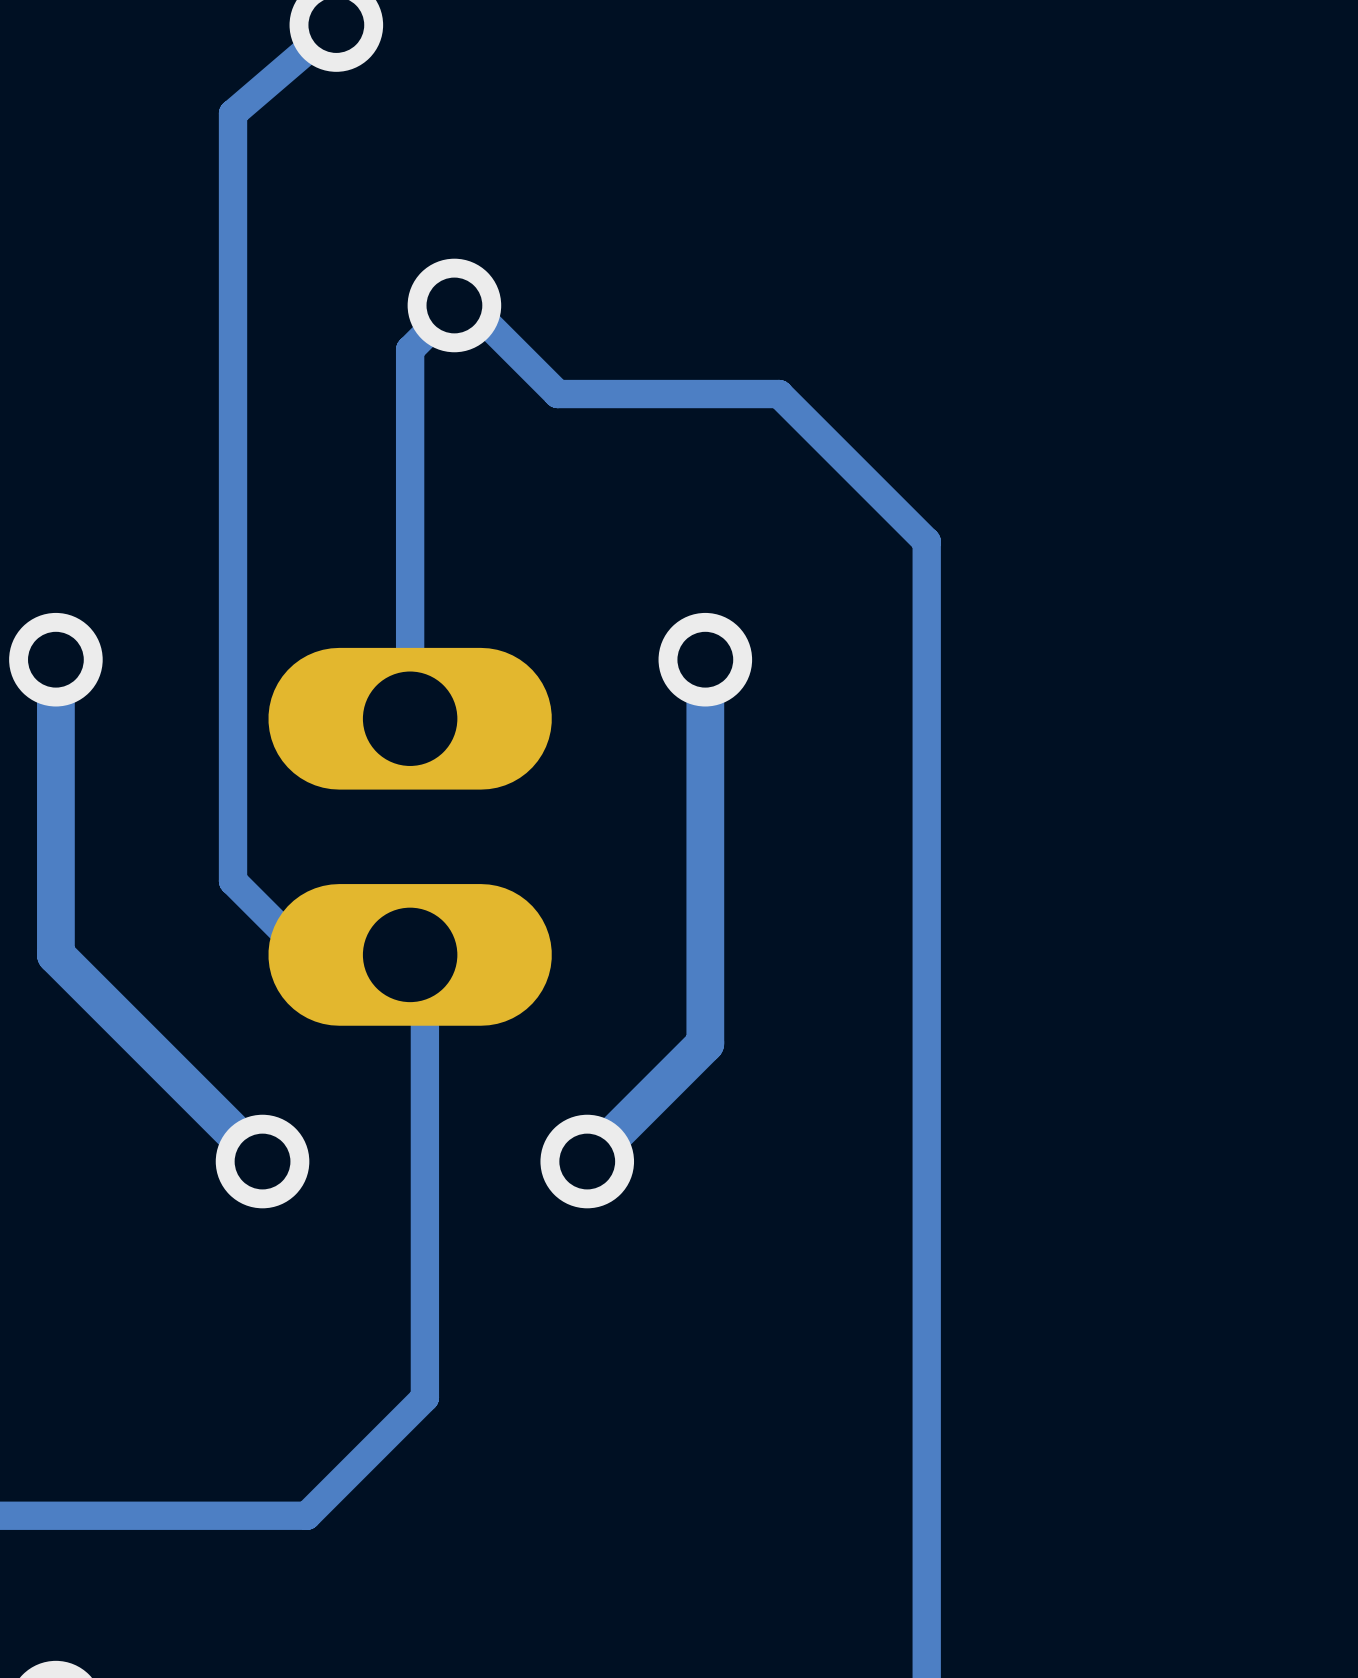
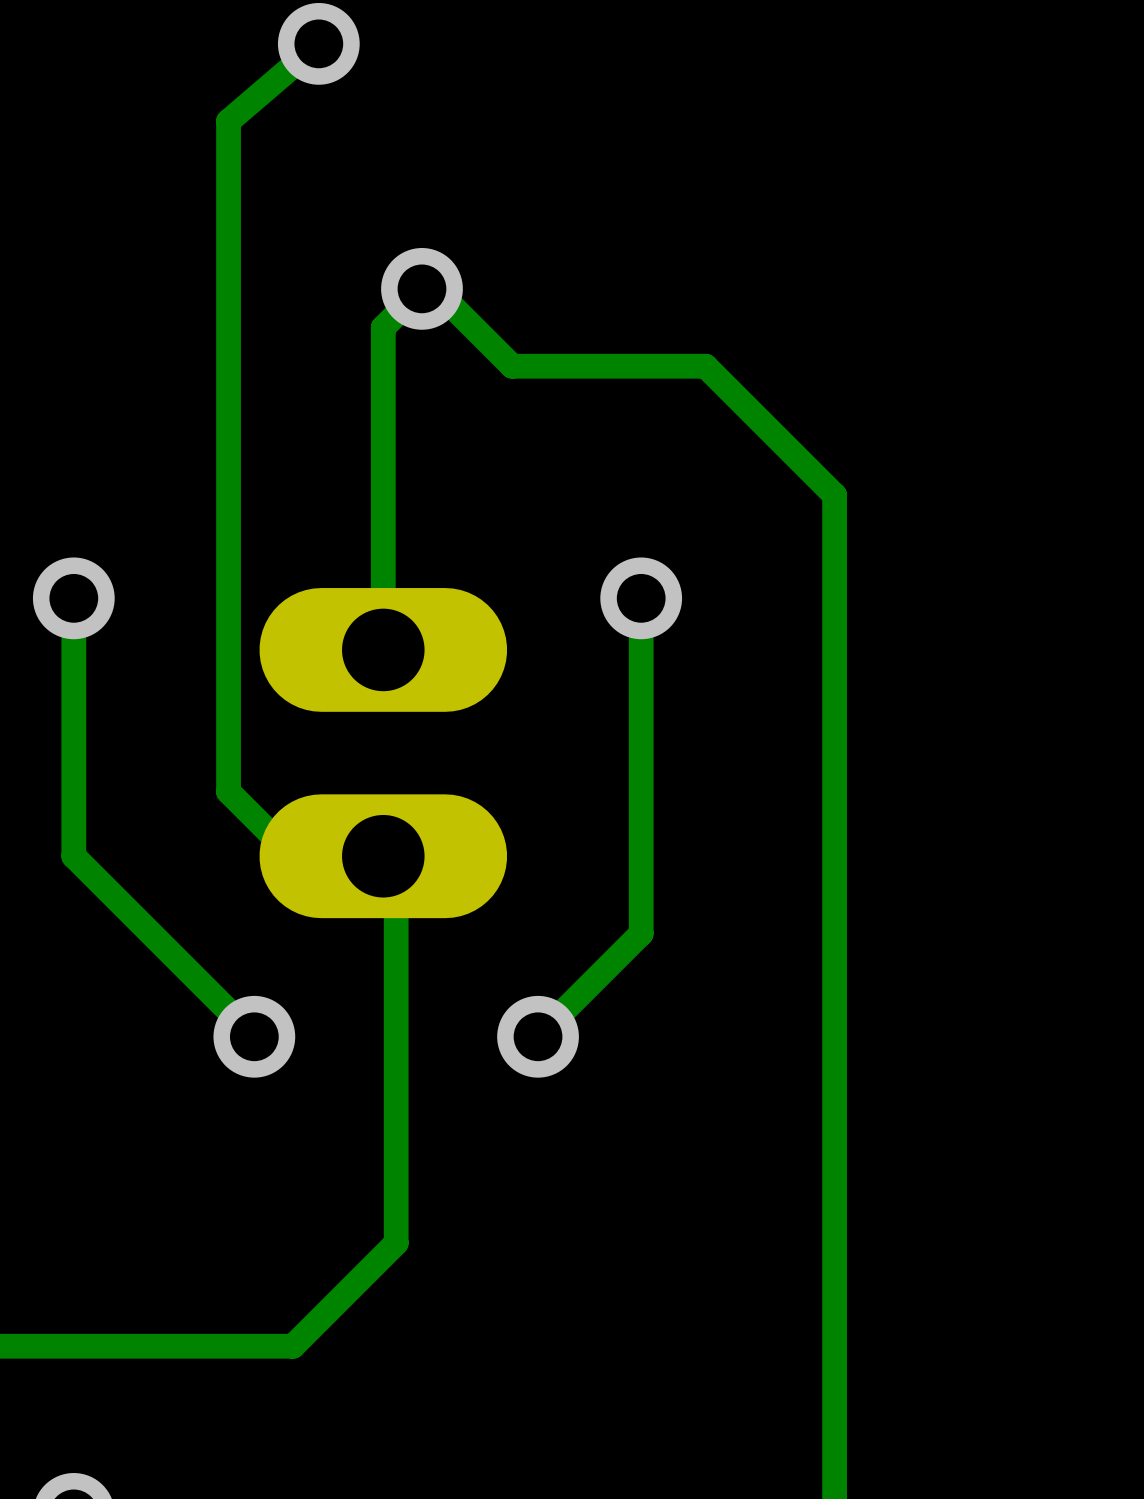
track width: thick (55, 659) (55, 954) (262, 1161) -> thin (73, 598) (73, 856) (254, 1036)
track width: thick (705, 659) (705, 1043) (587, 1161) -> thin (641, 598) (641, 933) (538, 1036)

